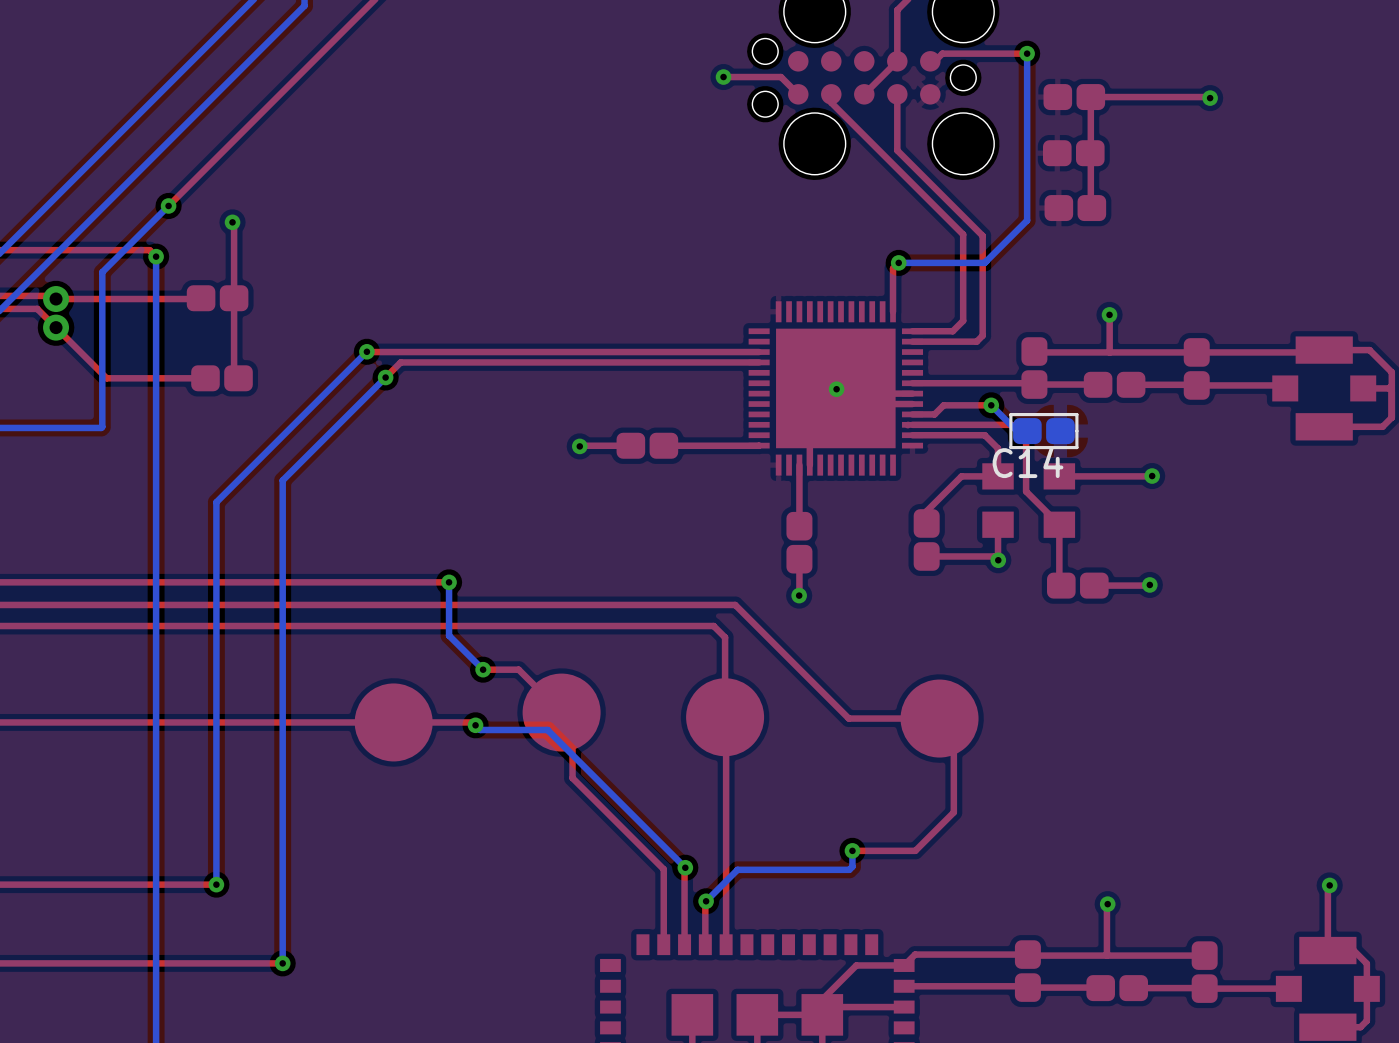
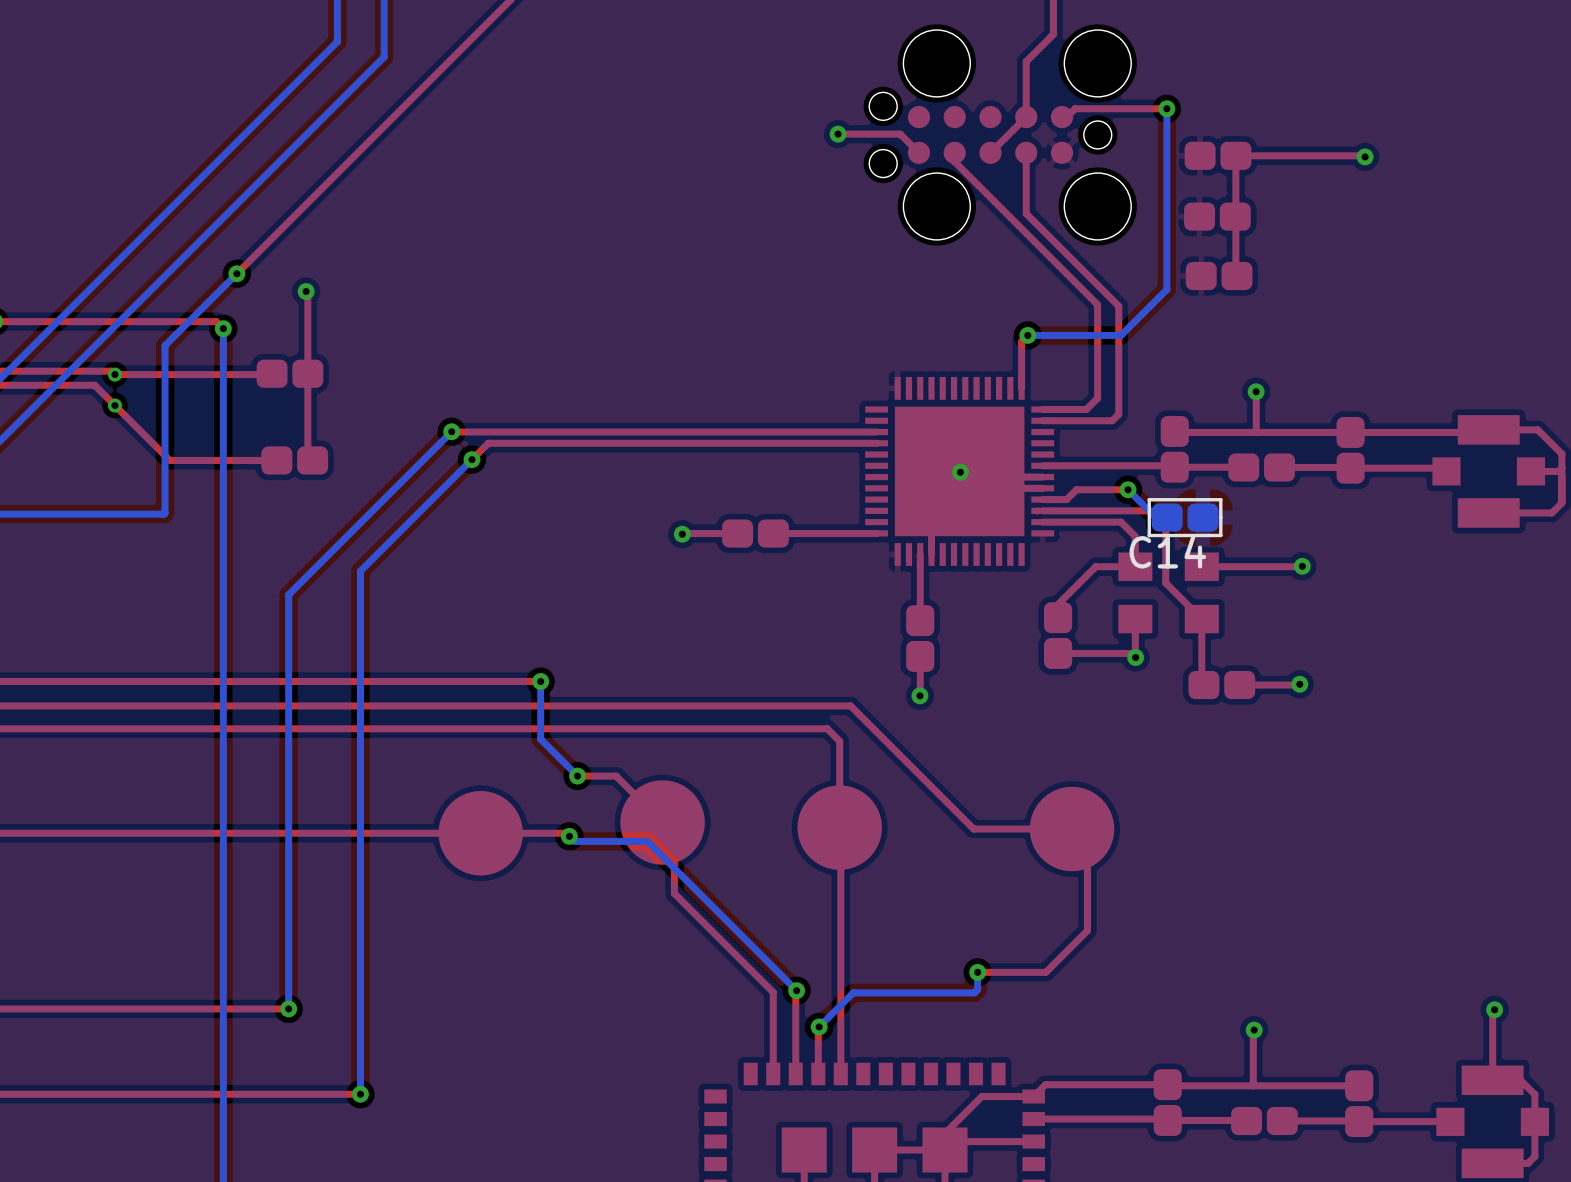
part footprint: [43, 286, 70, 341] -> [107, 367, 122, 413]

